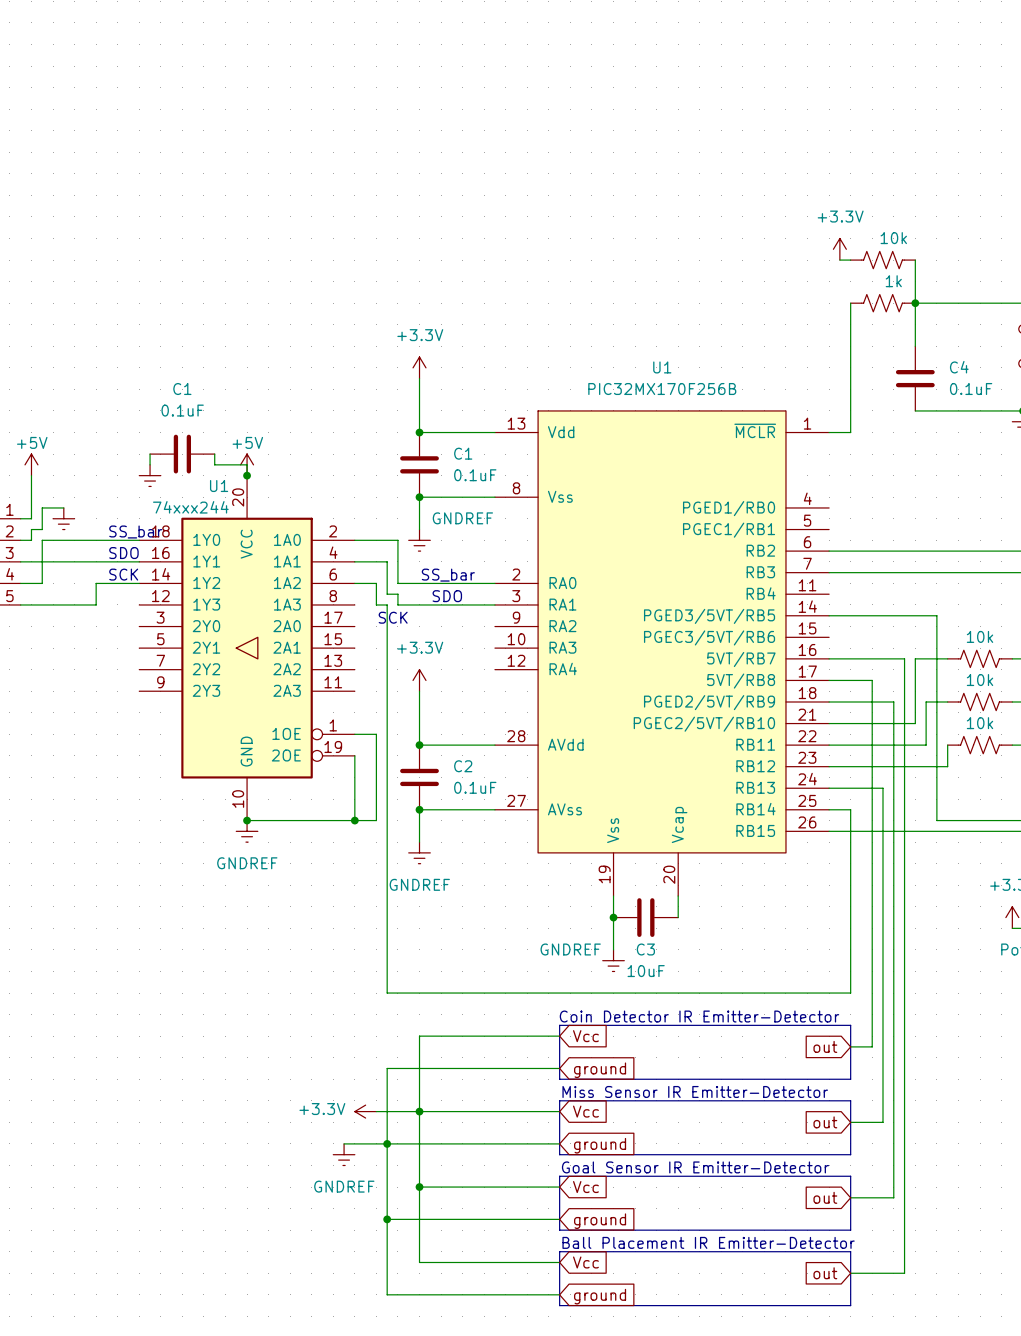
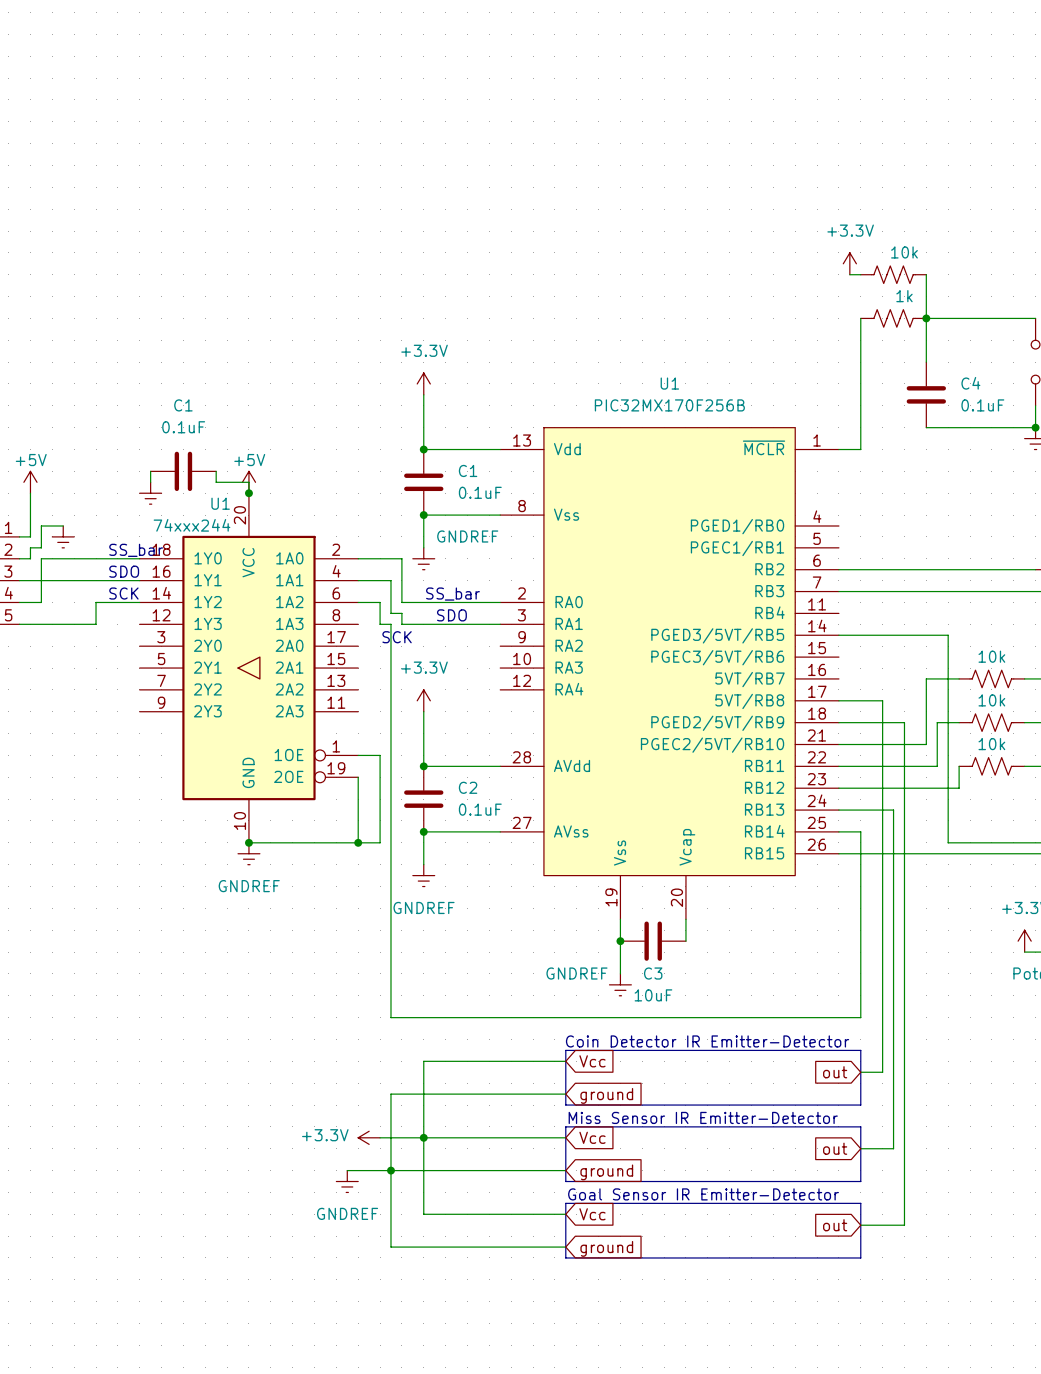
wire: (829, 658) (904, 658) (904, 1273) (850, 1273) -> none
wire: (419, 1187) (419, 1262) (559, 1262) -> none
junction: (419, 1187) -> none
wire: (387, 1219) (387, 1294) (559, 1294) -> none
junction: (387, 1219) -> none
text: Ball Placement IR Emitter-Detector (708, 1242) -> none
line: (559, 1251) (850, 1251) (850, 1305) (559, 1305) (559, 1251) -> none
global label: Vcc (585, 1262) -> none
global label: out (825, 1273) -> none
global label: ground (600, 1296) -> none

